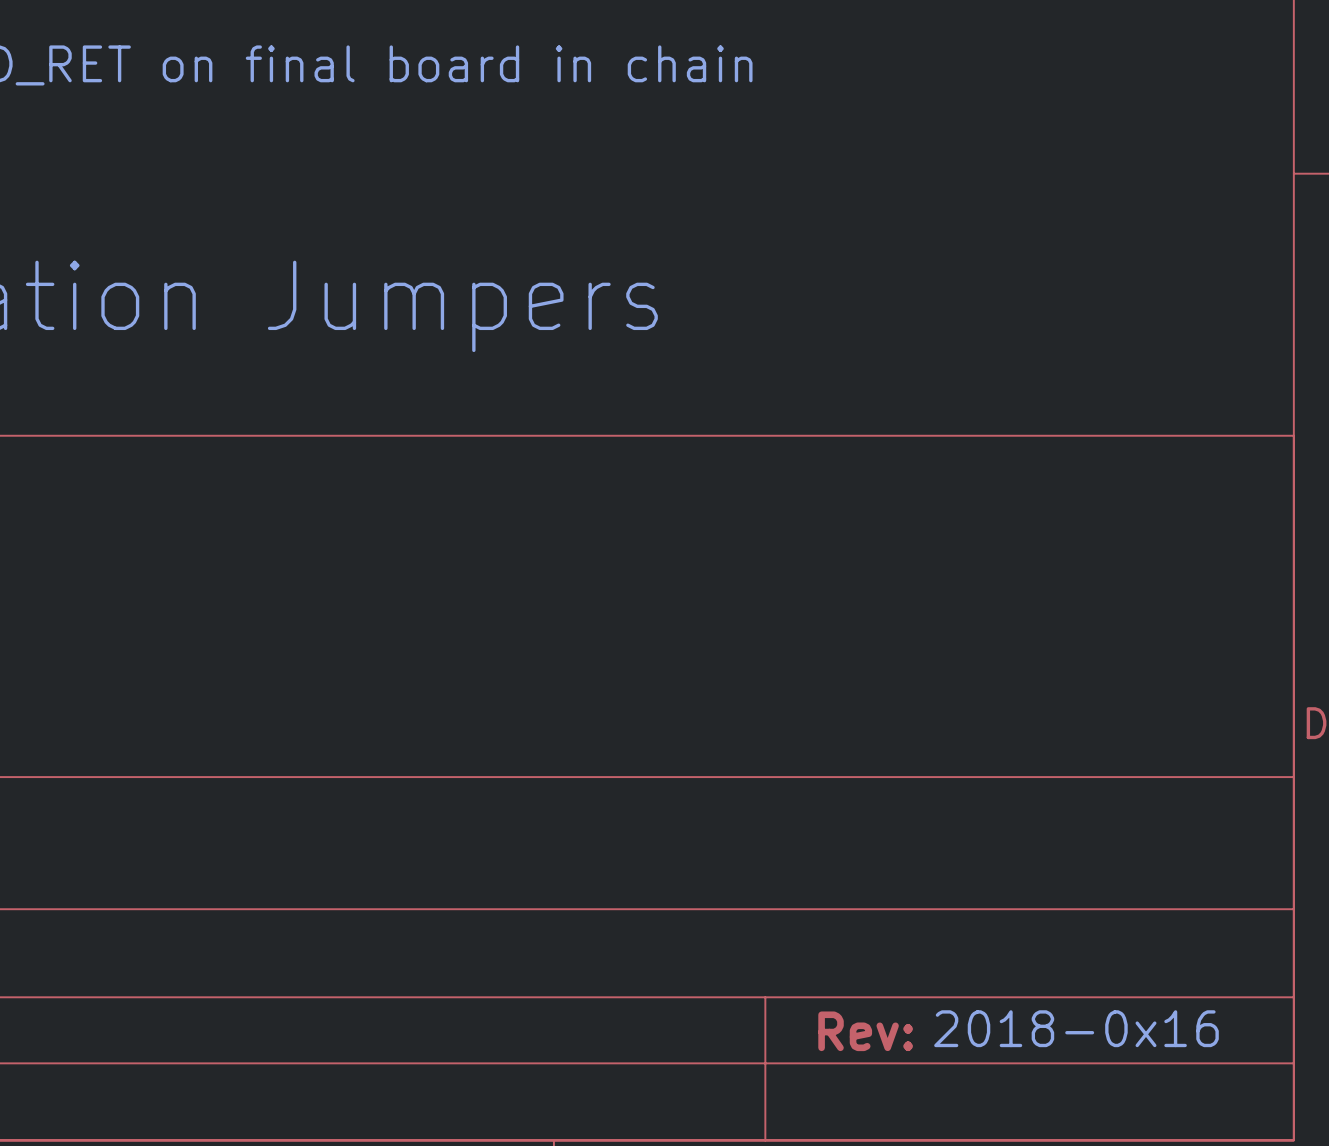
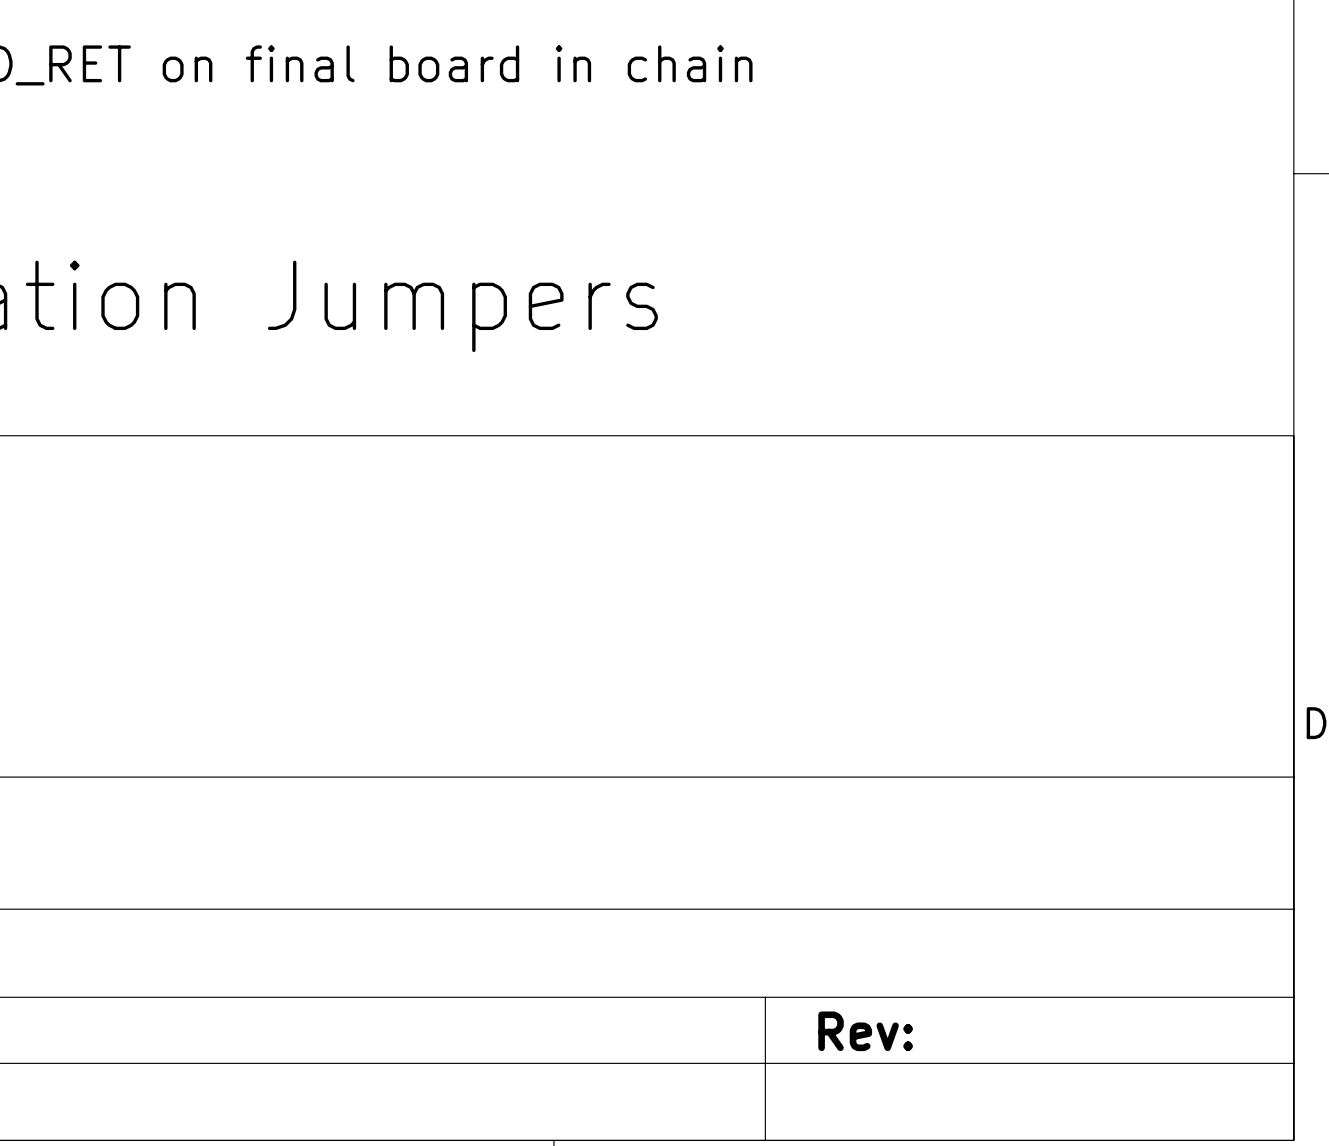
text: 2018-0x16 (1076, 1028) -> none

